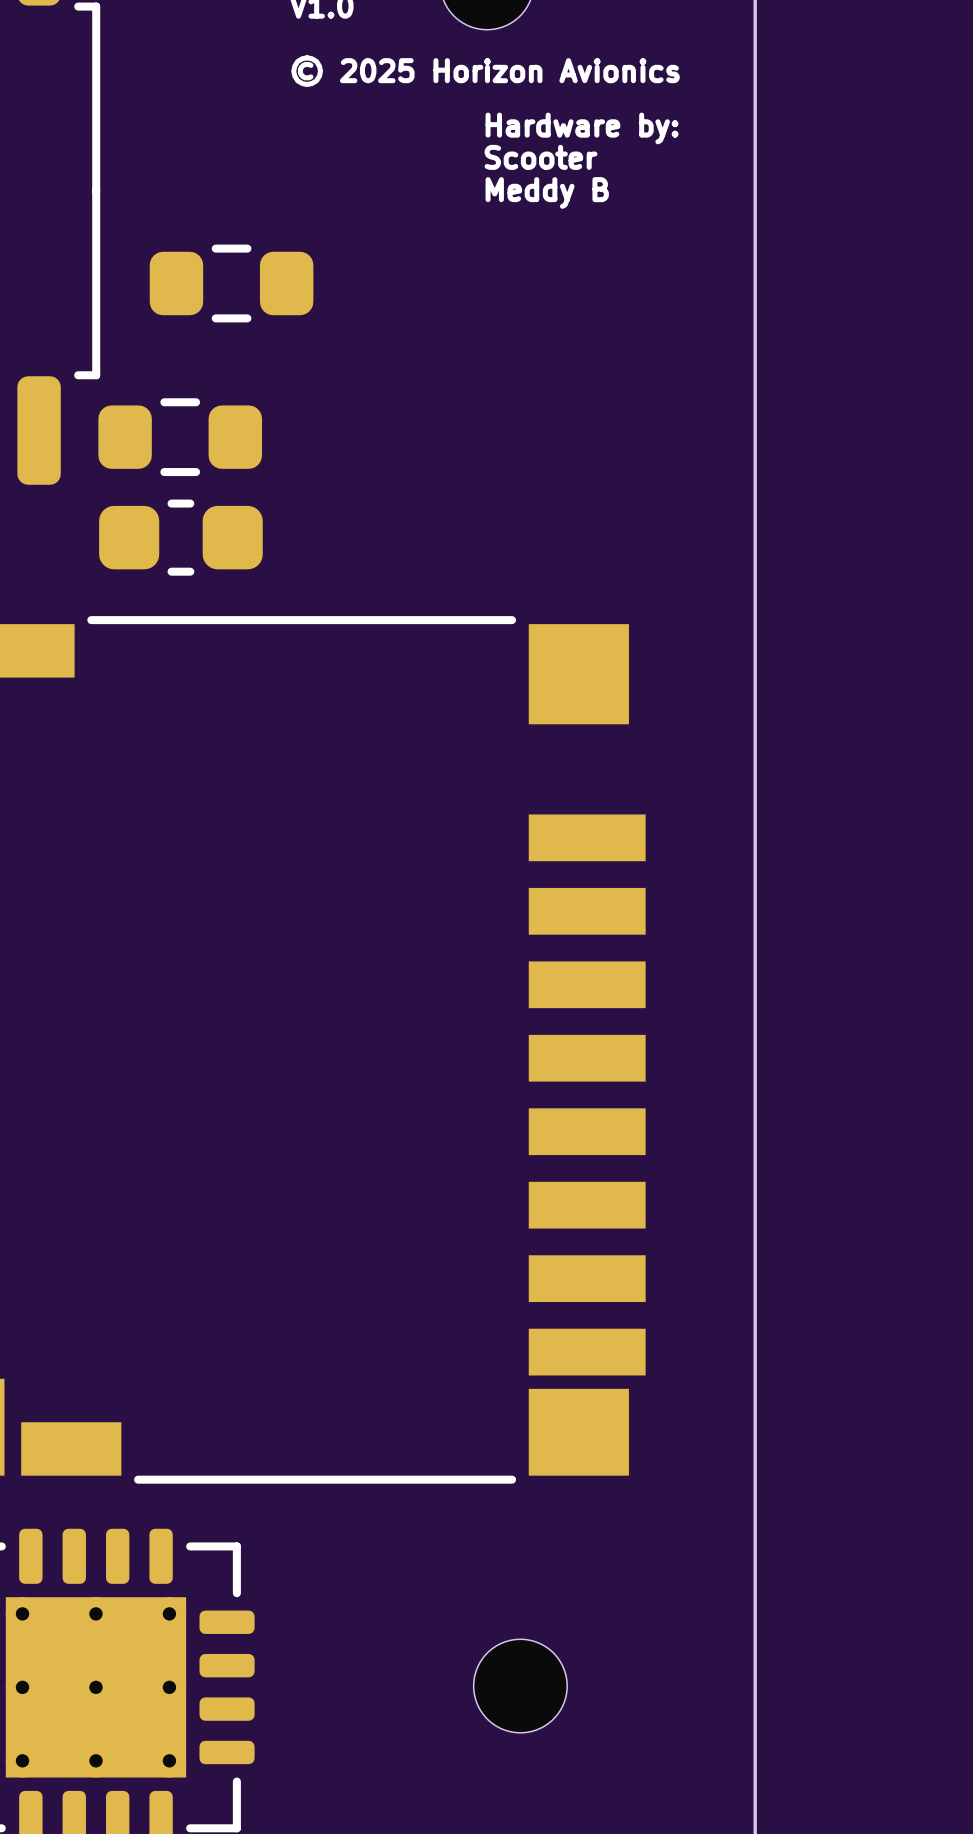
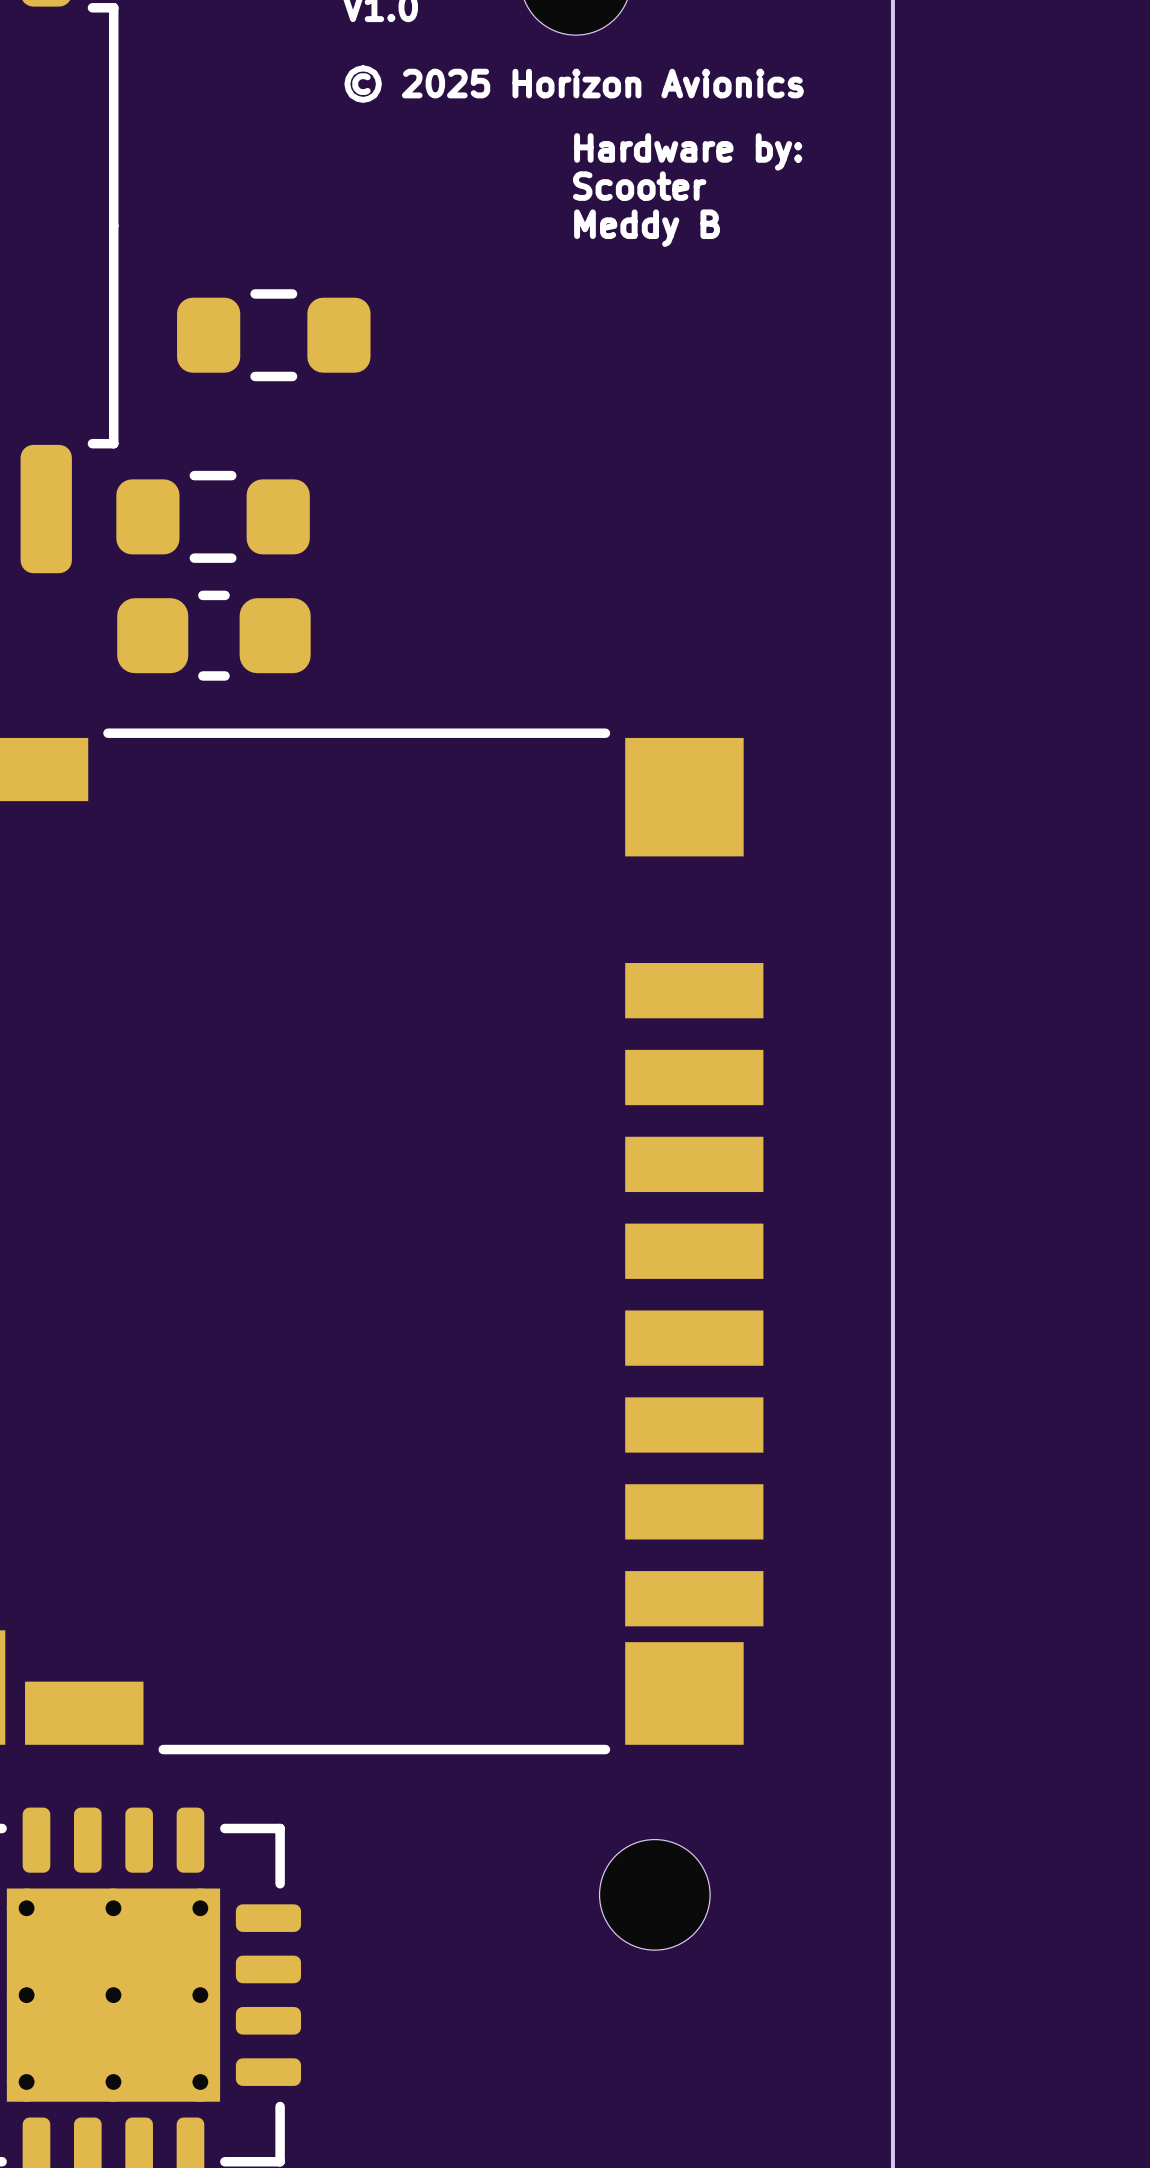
part position: (520, 1686) -> (654, 1894)

